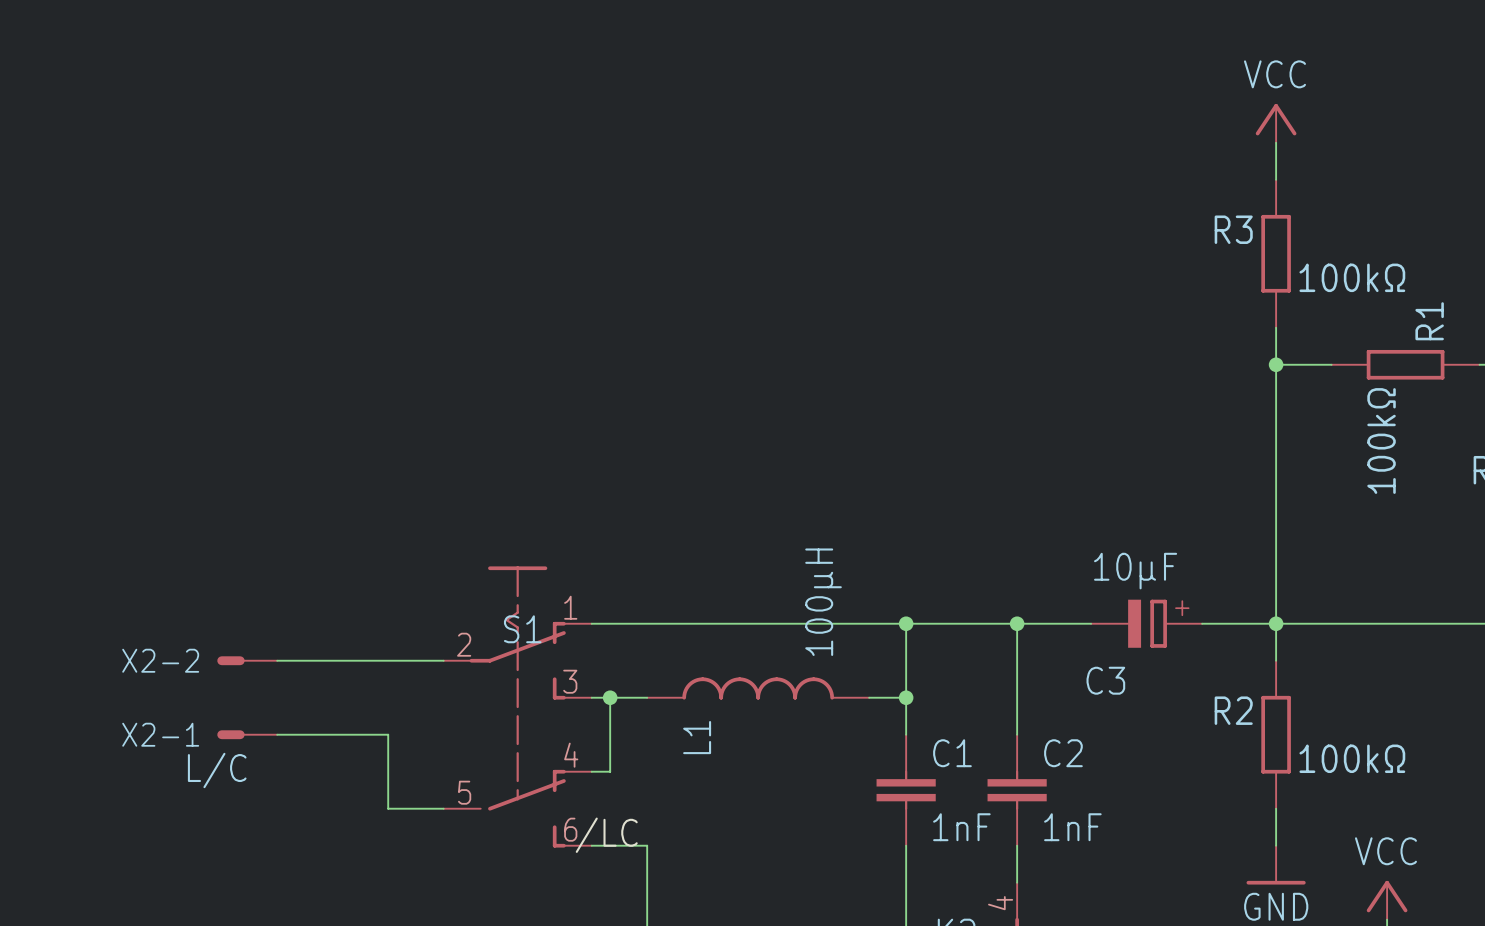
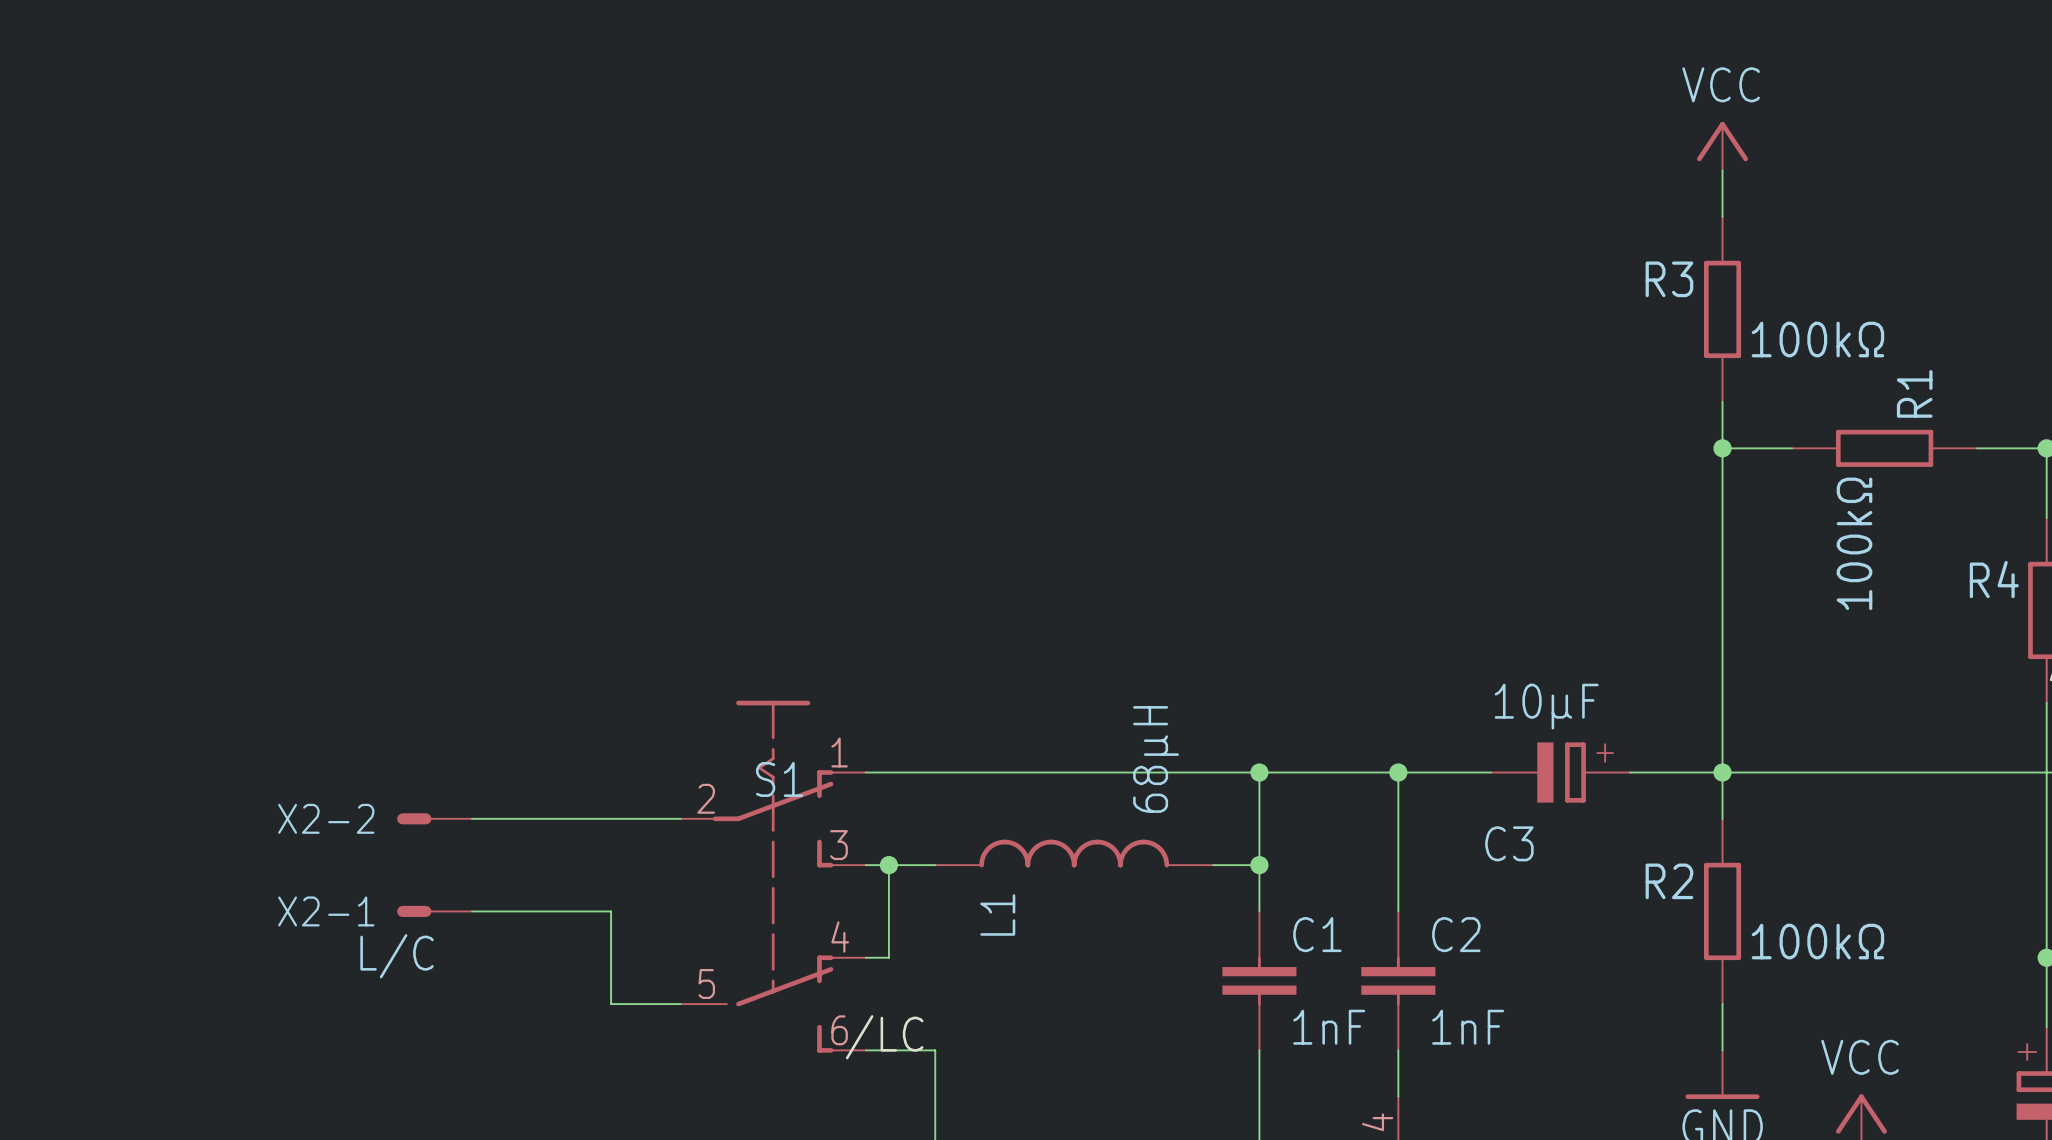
L1 value: 100μH (823, 602) -> 68μH (1156, 759)

